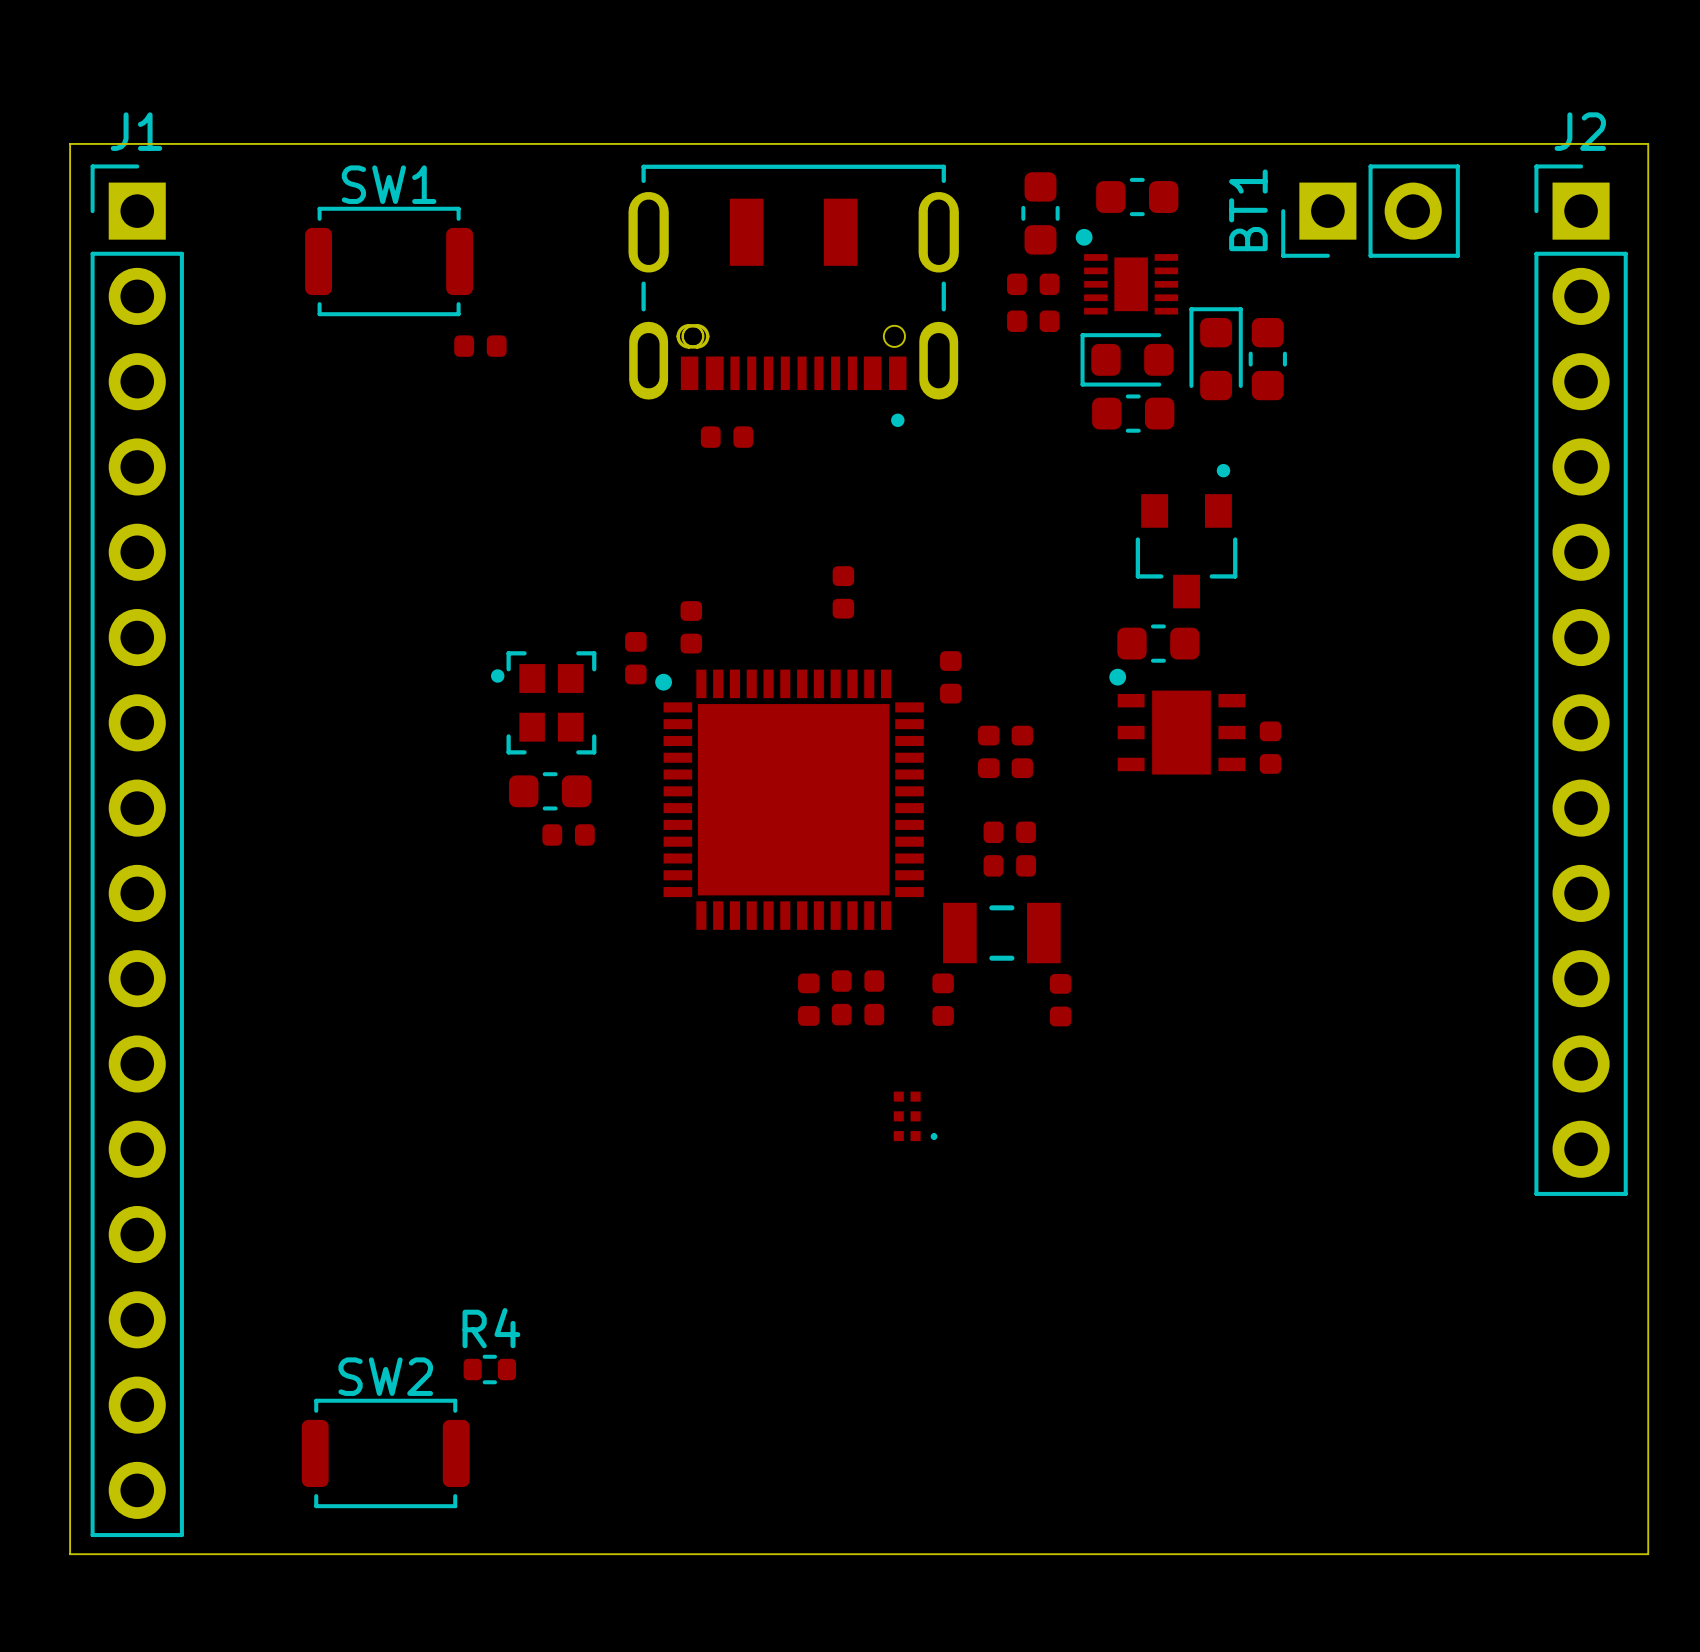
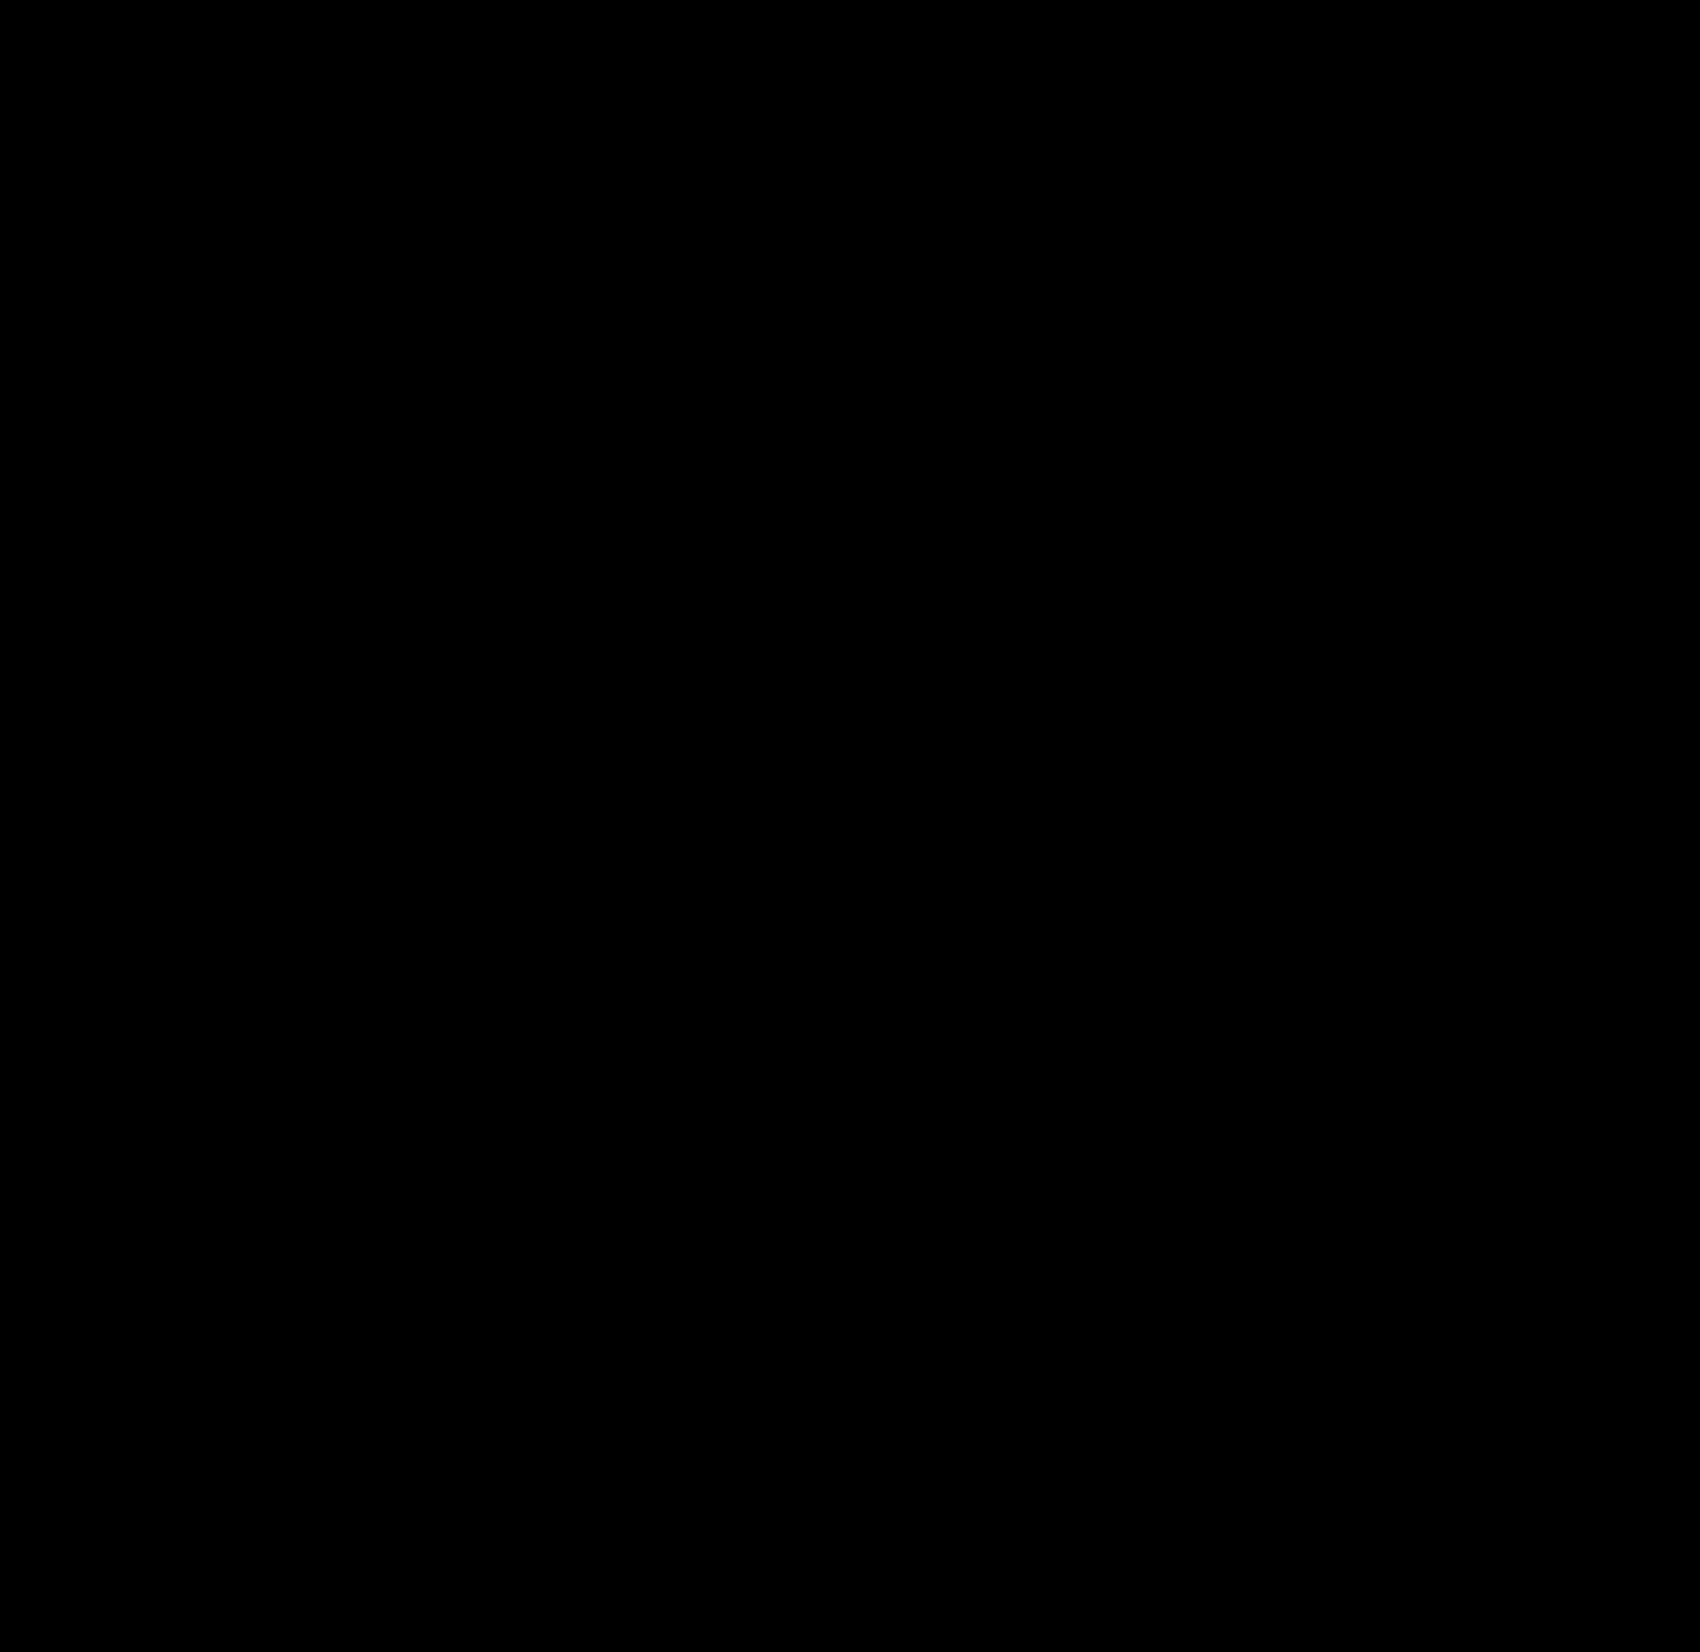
board edge: (70, 143) (1648, 143) (1648, 1554) (70, 1554) (70, 143) -> none
part: (1137, 197) -> none
BT1: (1370, 211) -> none
part: (1040, 213) -> none
SW1: (389, 261) -> none
part: (1126, 271) -> none
part: (1033, 284) -> none
part: (793, 295) -> none
part: (1033, 321) -> none
part: (480, 346) -> none
part: (1216, 353) -> none
part: (1127, 359) -> none
part: (1267, 359) -> none
part: (1133, 413) -> none
part: (727, 437) -> none
part: (1186, 536) -> none
part: (843, 592) -> none
part: (691, 627) -> none
part: (1158, 643) -> none
part: (635, 658) -> none
part: (950, 677) -> none
J2: (1581, 680) -> none
part: (543, 702) -> none
part: (1177, 721) -> none
part: (1270, 747) -> none
part: (988, 751) -> none
part: (1022, 751) -> none
part: (550, 791) -> none
part: (789, 799) -> none
part: (1009, 832) -> none
part: (568, 834) -> none
J1: (137, 850) -> none
part: (1009, 865) -> none
part: (1001, 933) -> none
part: (857, 981) -> none
part: (808, 999) -> none
part: (943, 999) -> none
part: (1060, 1000) -> none
part: (857, 1014) -> none
part: (915, 1116) -> none
R4: (489, 1369) -> none
SW2: (385, 1453) -> none

